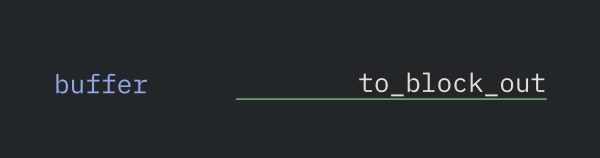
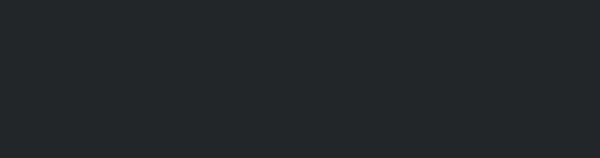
text: buffer (101, 83) -> none
label: to_block_out (451, 84) -> none
wire: (236, 99) (546, 99) -> none

